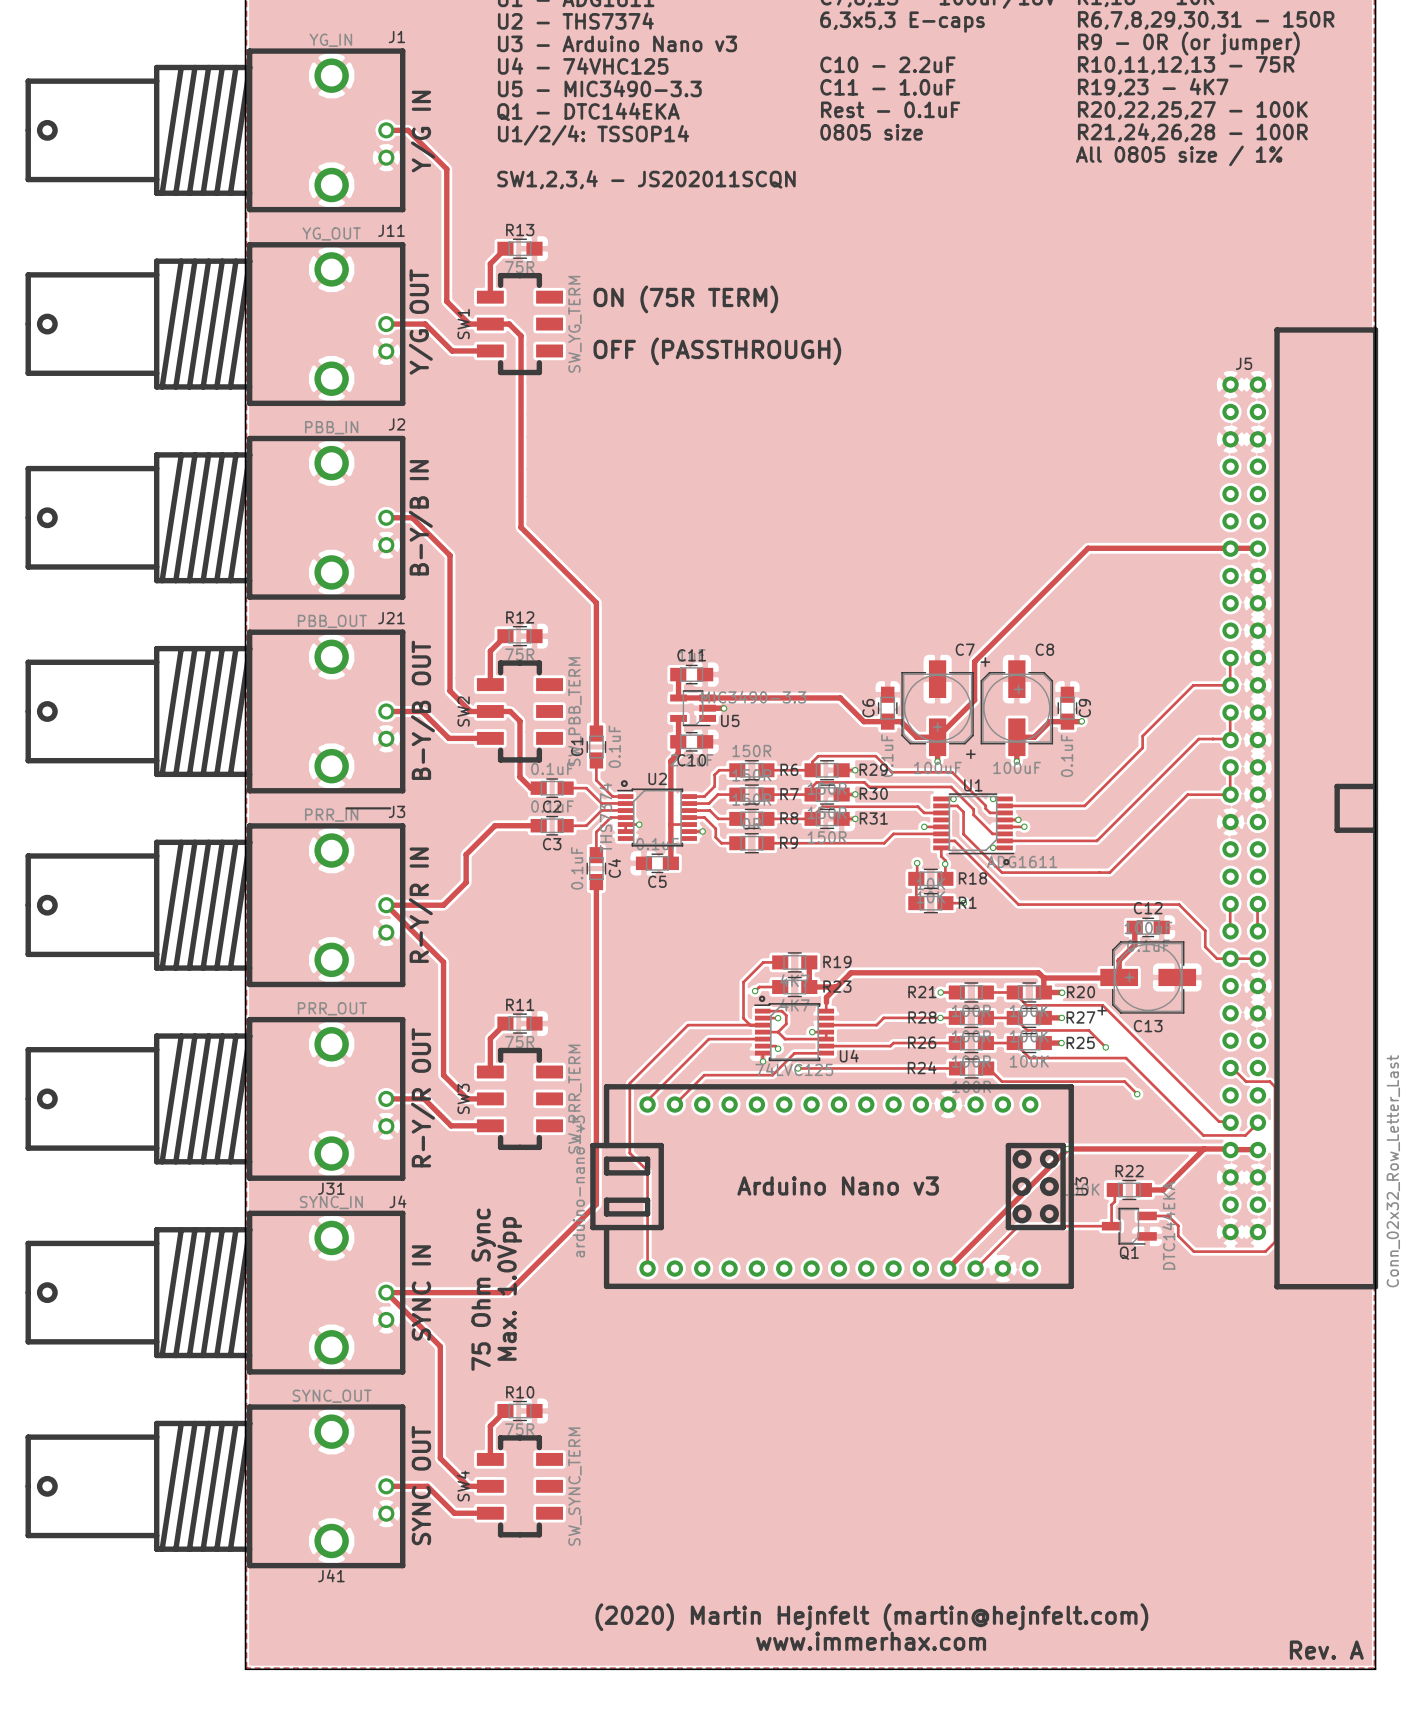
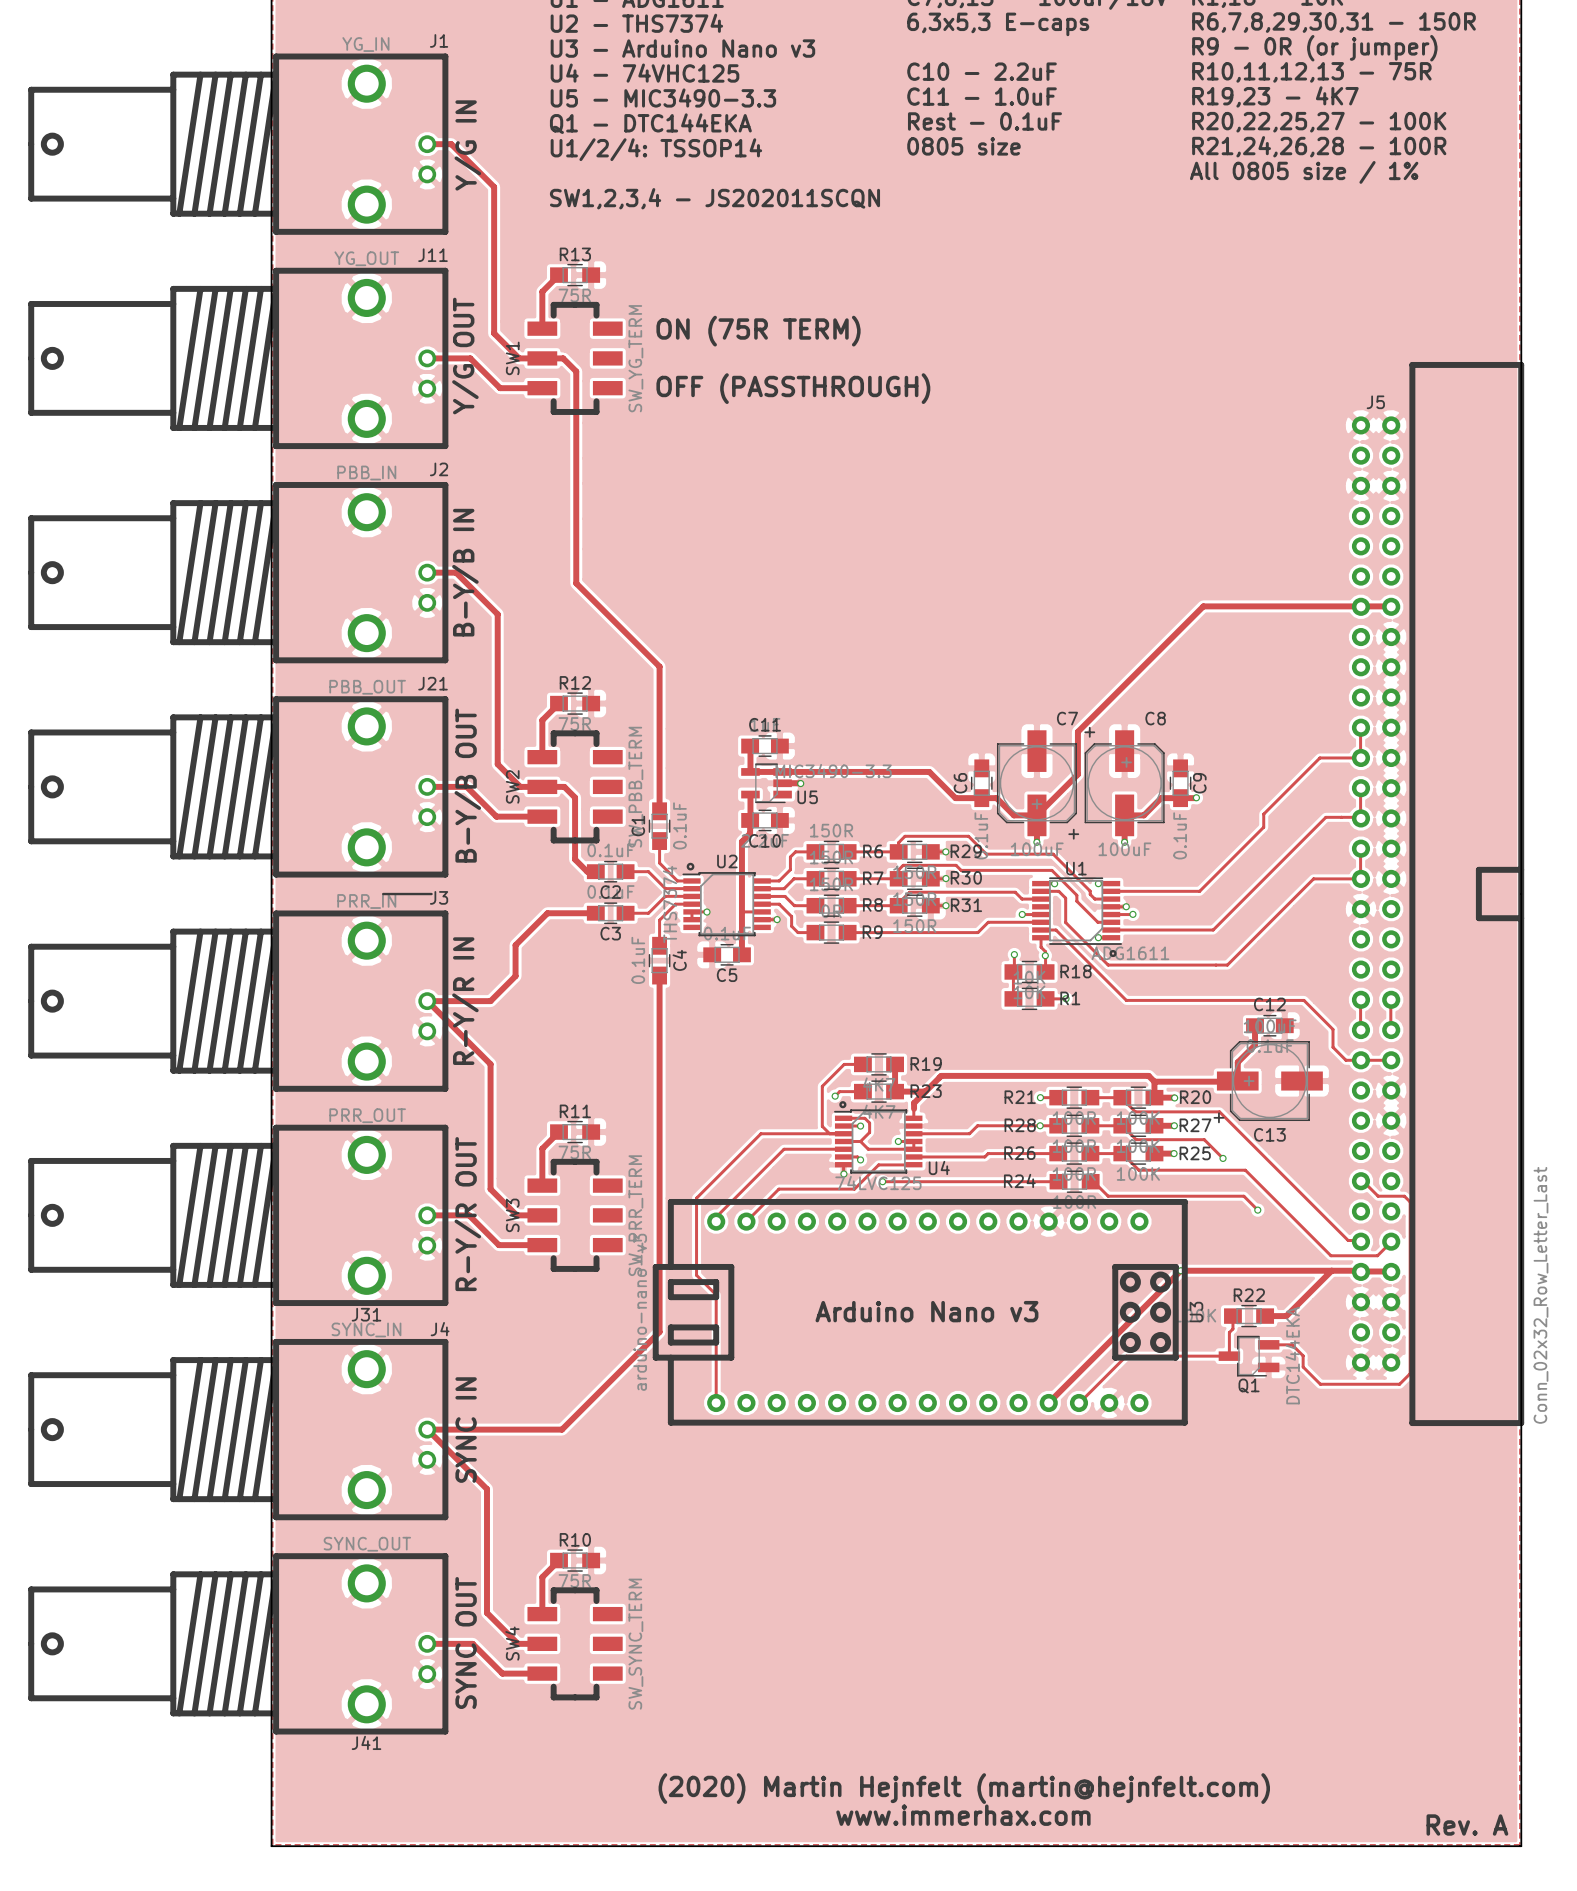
text: Max. 1.0Vpp (509, 1288) -> none
text: 75 Ohm Sync (483, 1289) -> none

